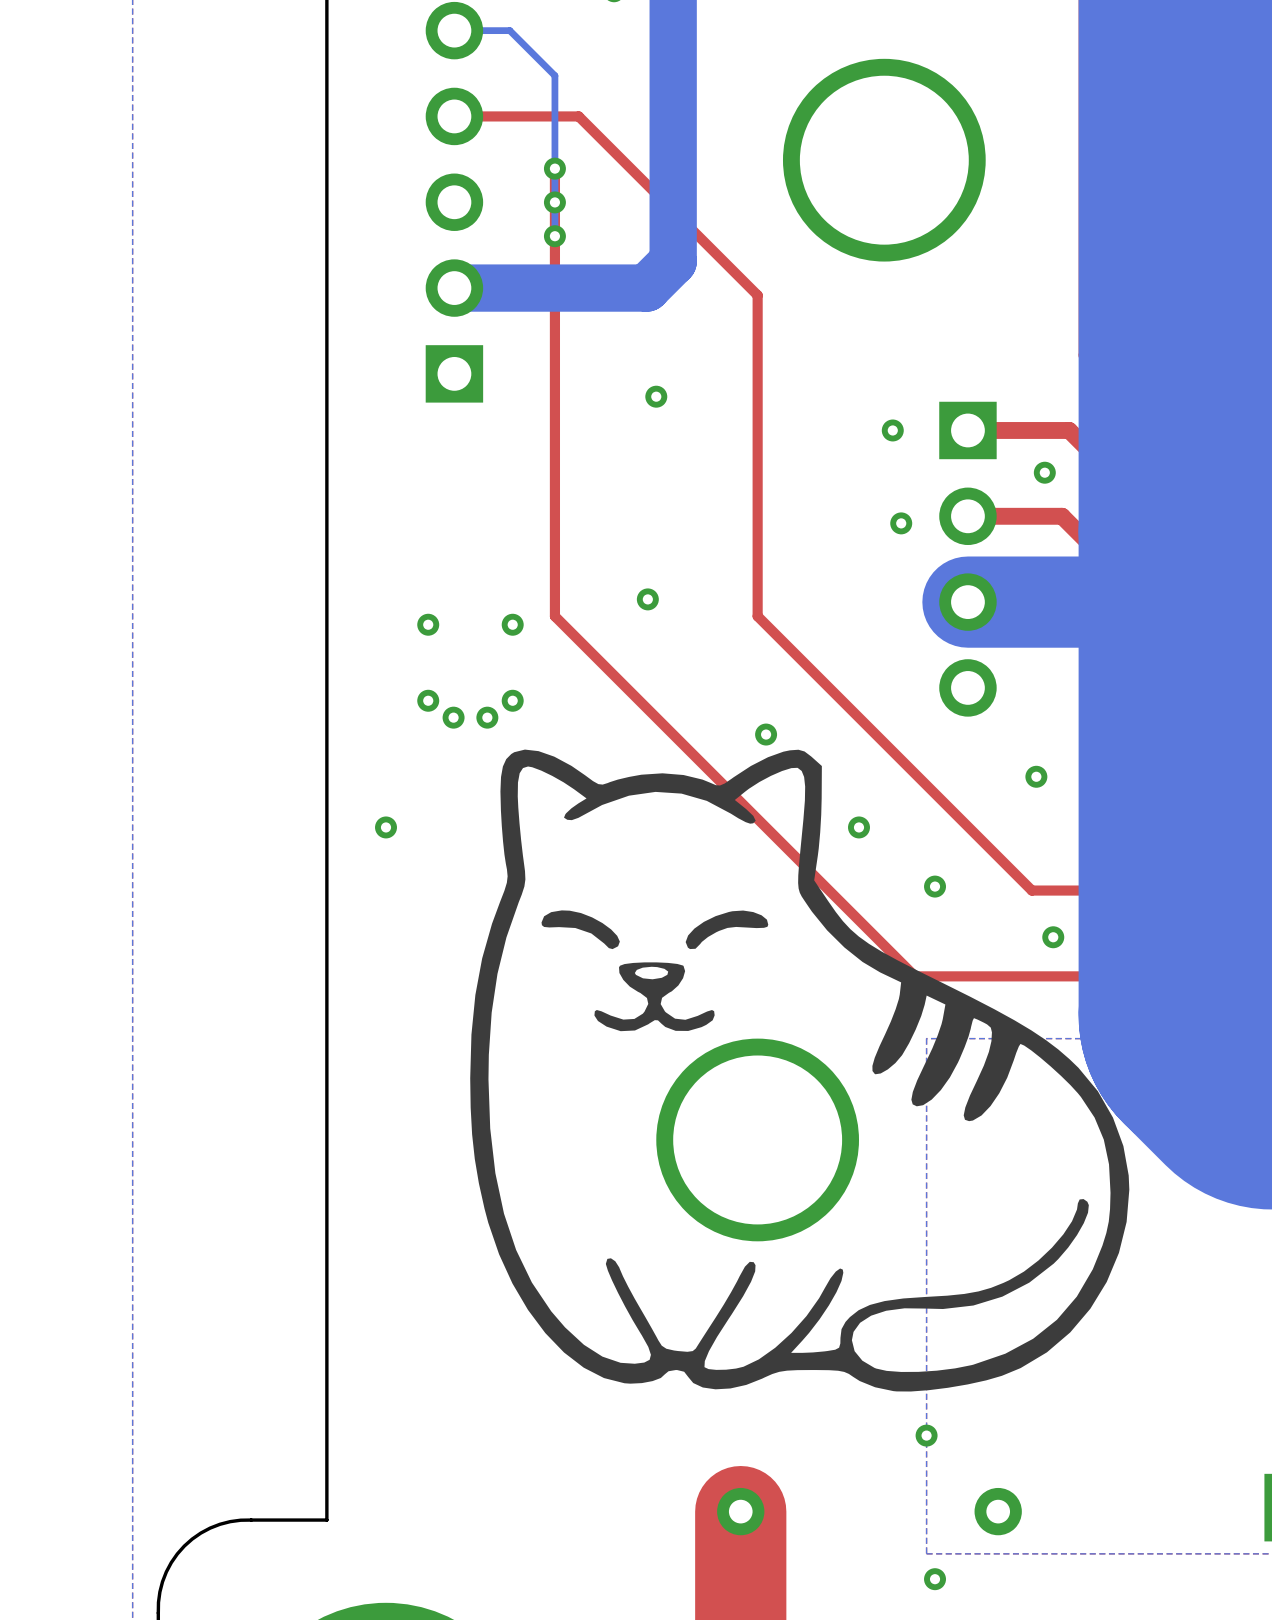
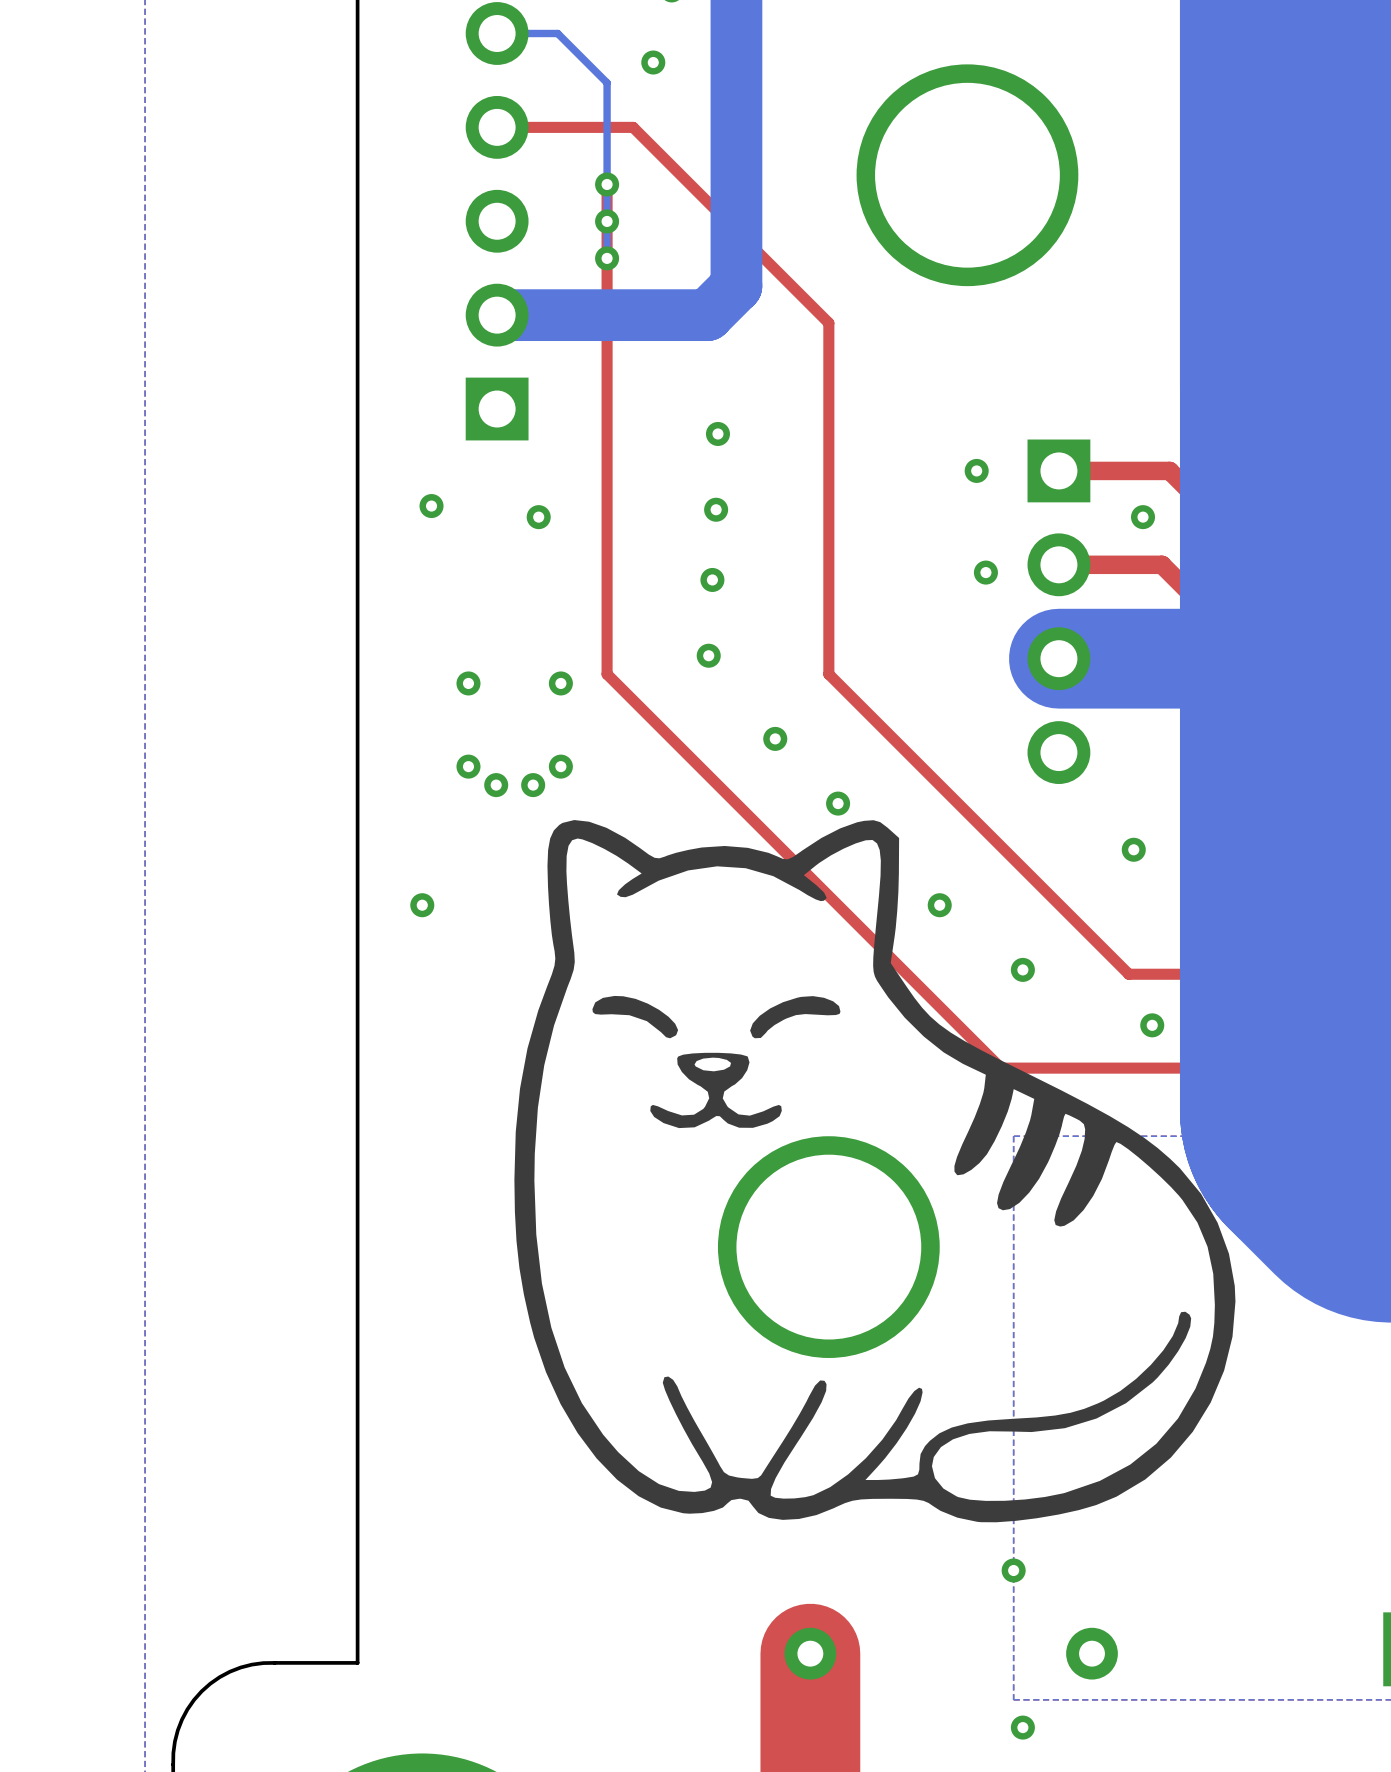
via: none -> (653, 62)
via: none -> (431, 506)
via: none -> (716, 509)
via: none -> (538, 517)
via: none -> (712, 579)
via: none -> (775, 738)

